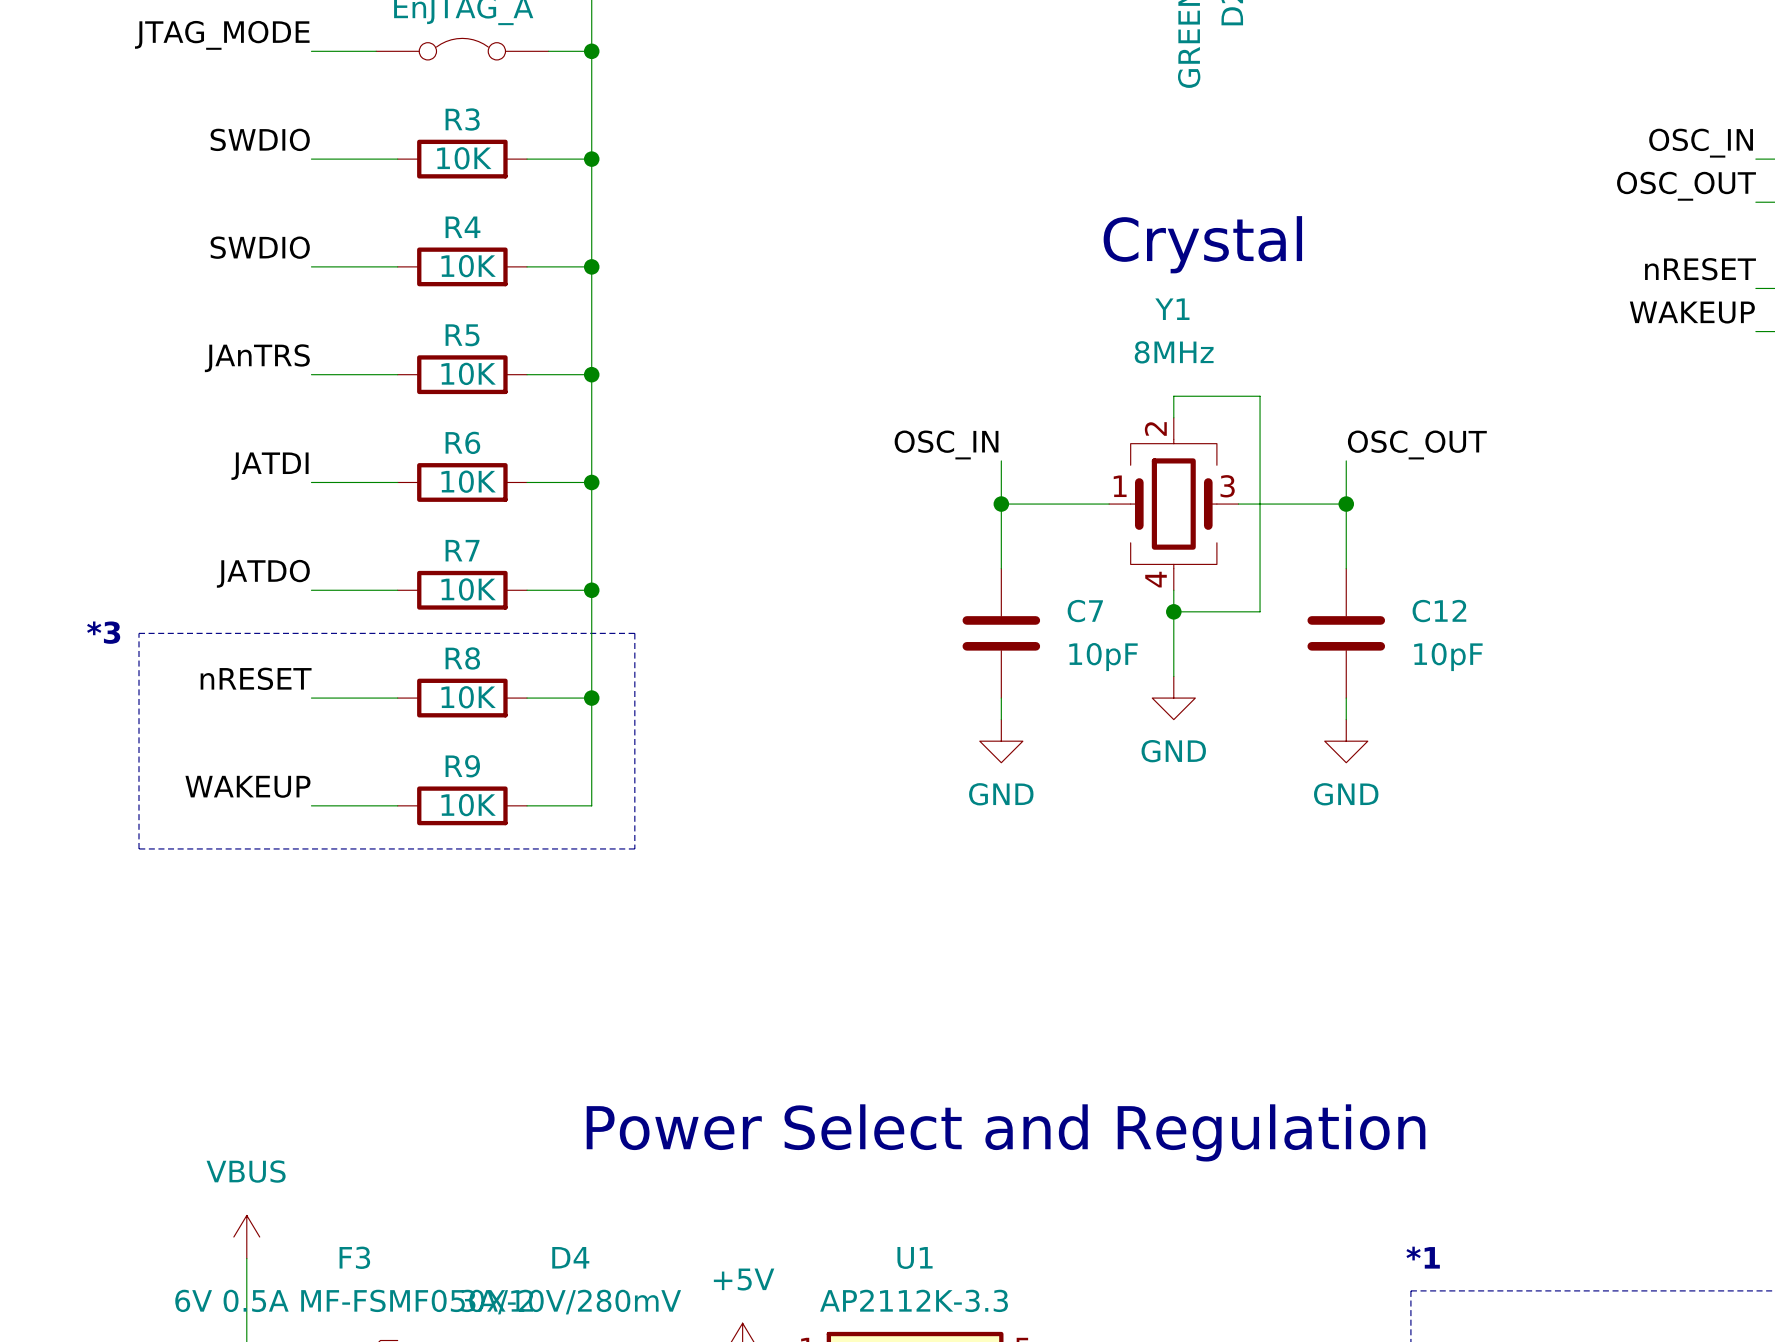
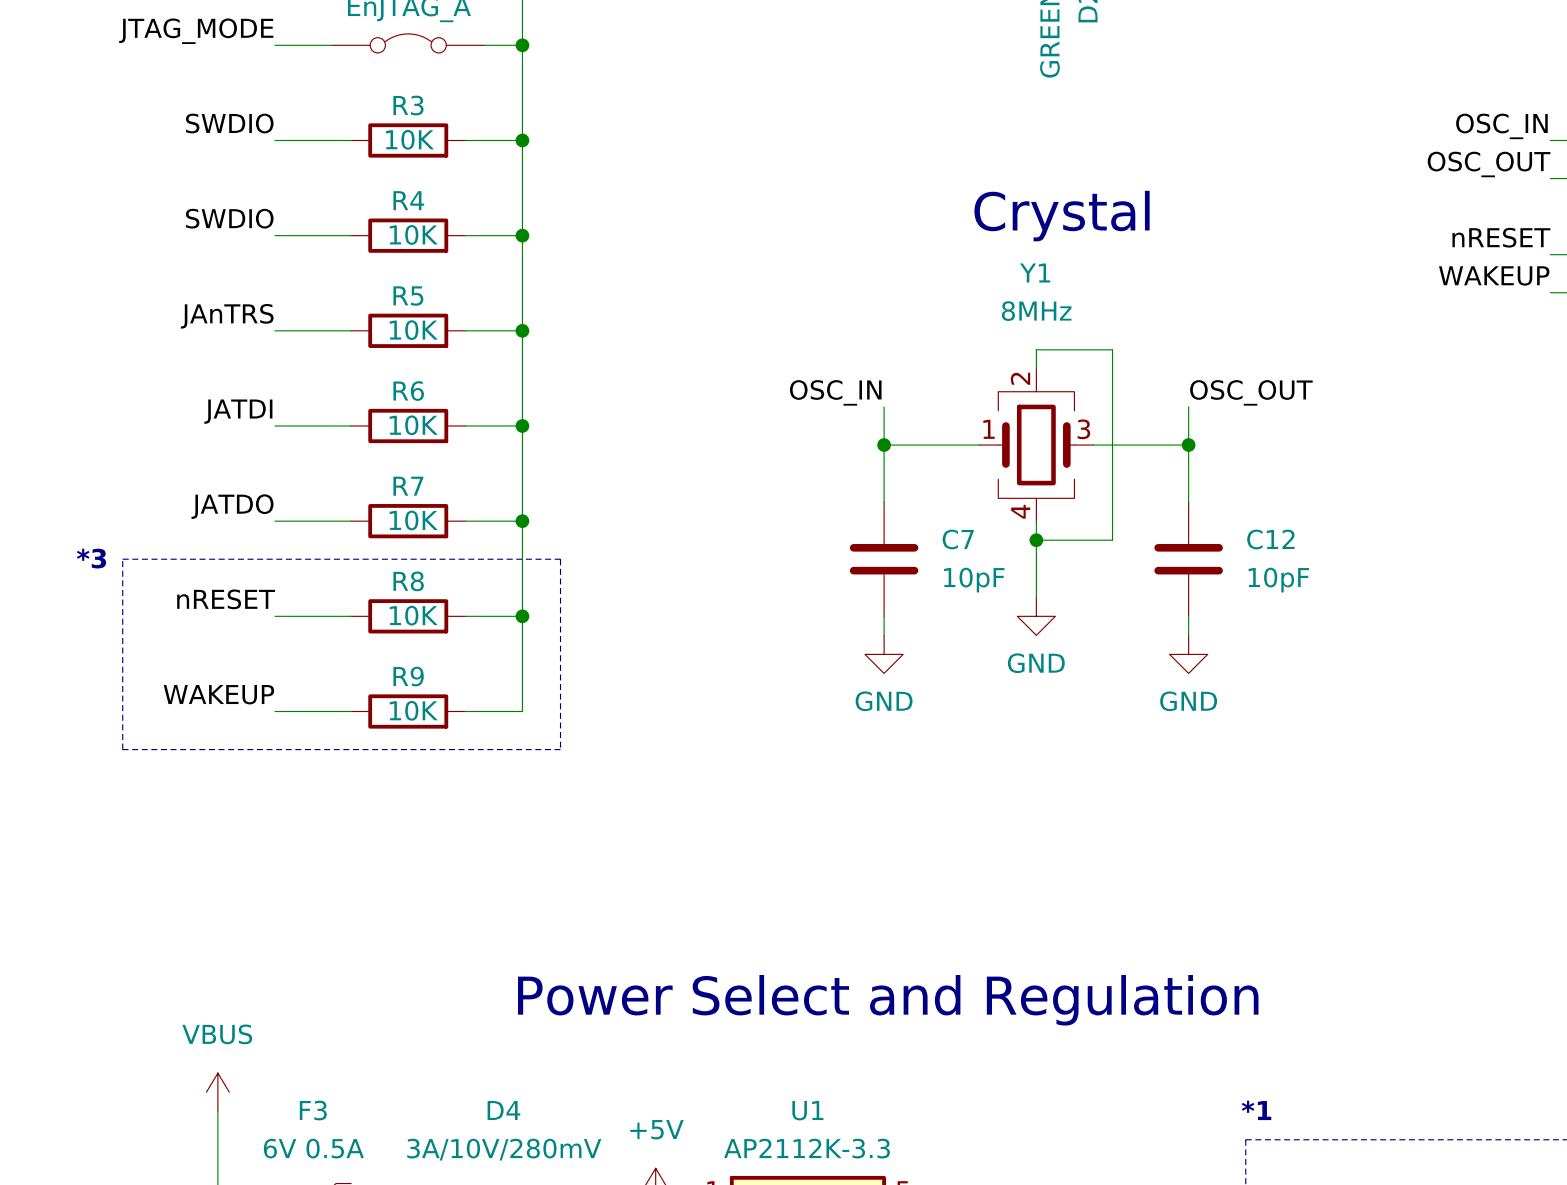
F3 value: 6V 0.5A MF-FSMF050X-2 (354, 1300) -> 6V 0.5A (313, 1148)

